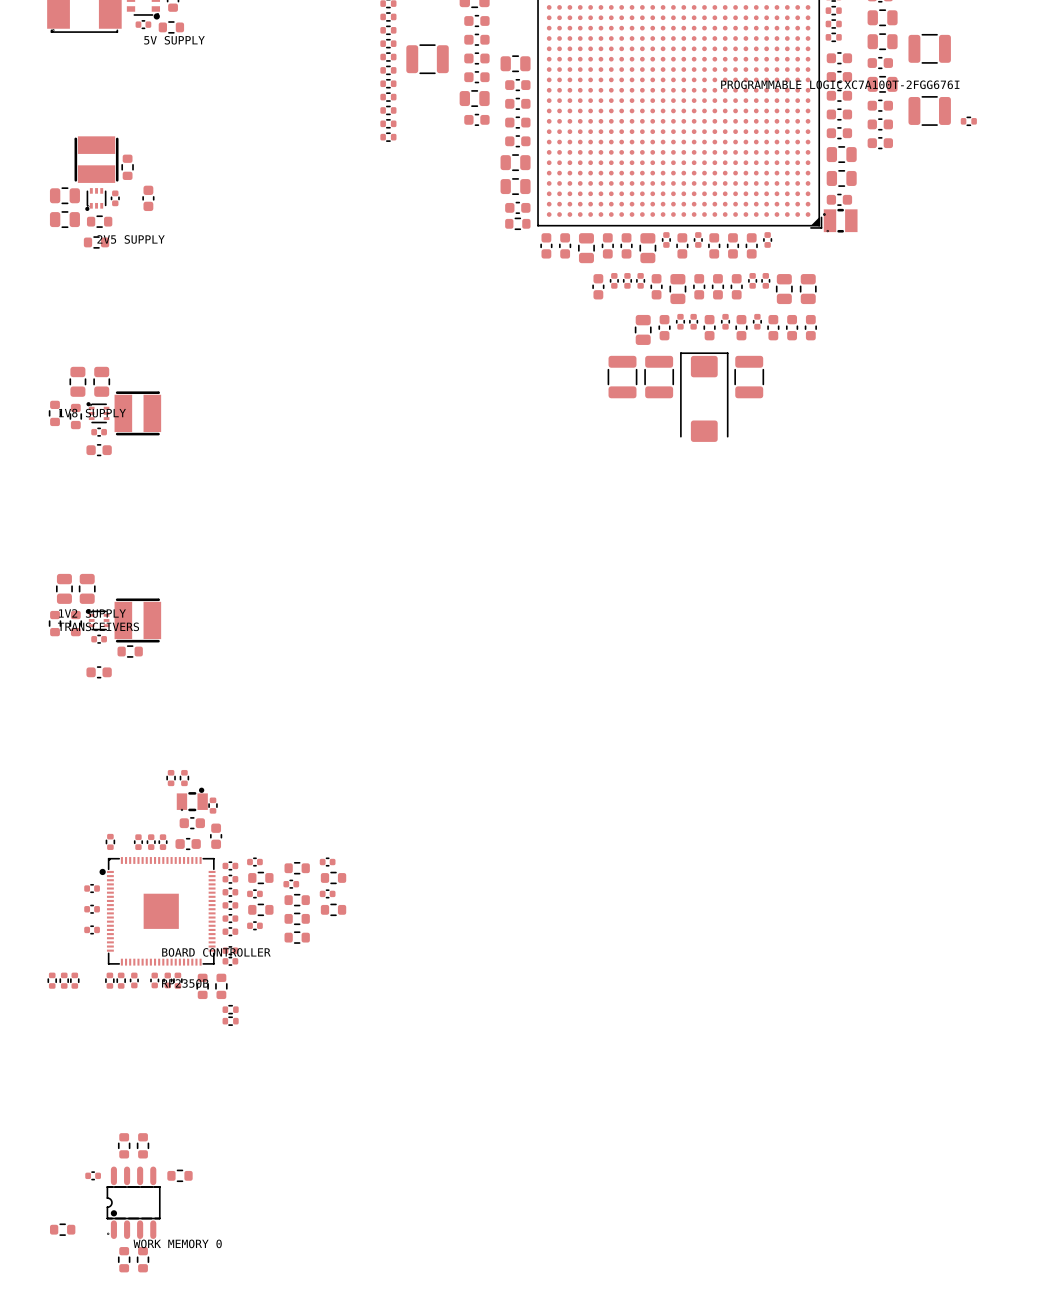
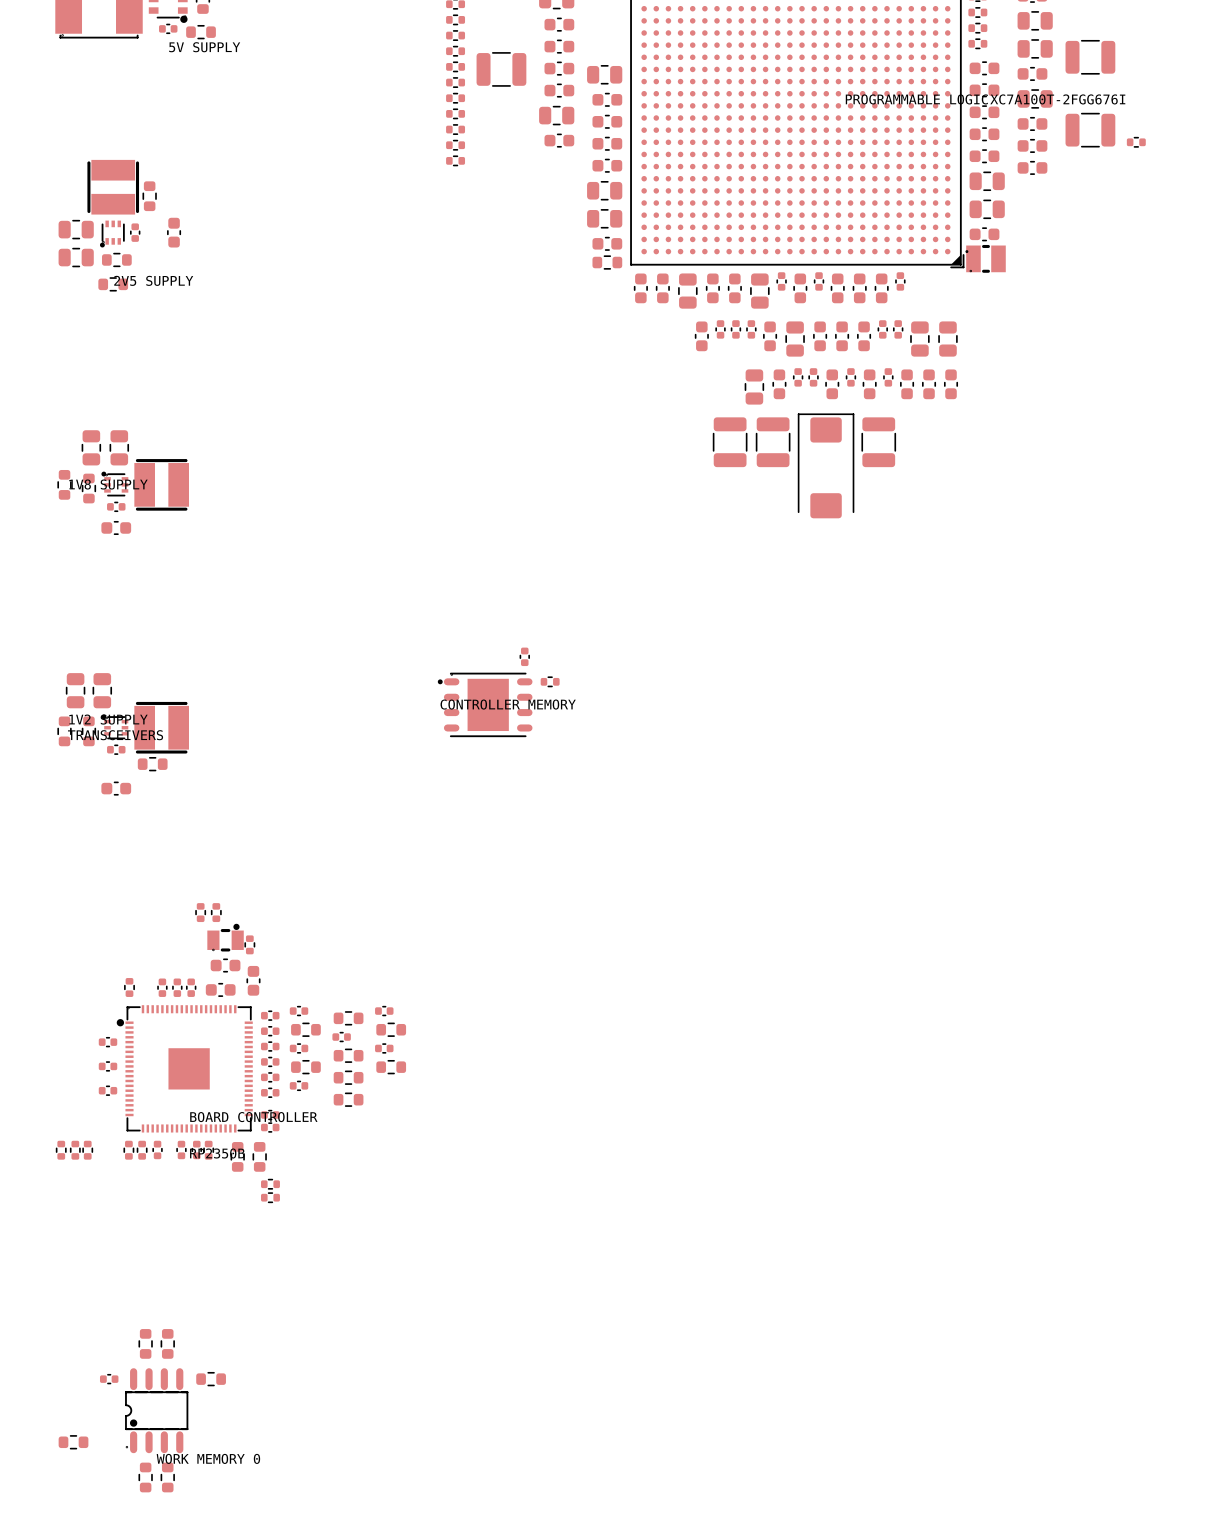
part: none -> (524, 656)
part: none -> (550, 681)
part: none -> (485, 704)

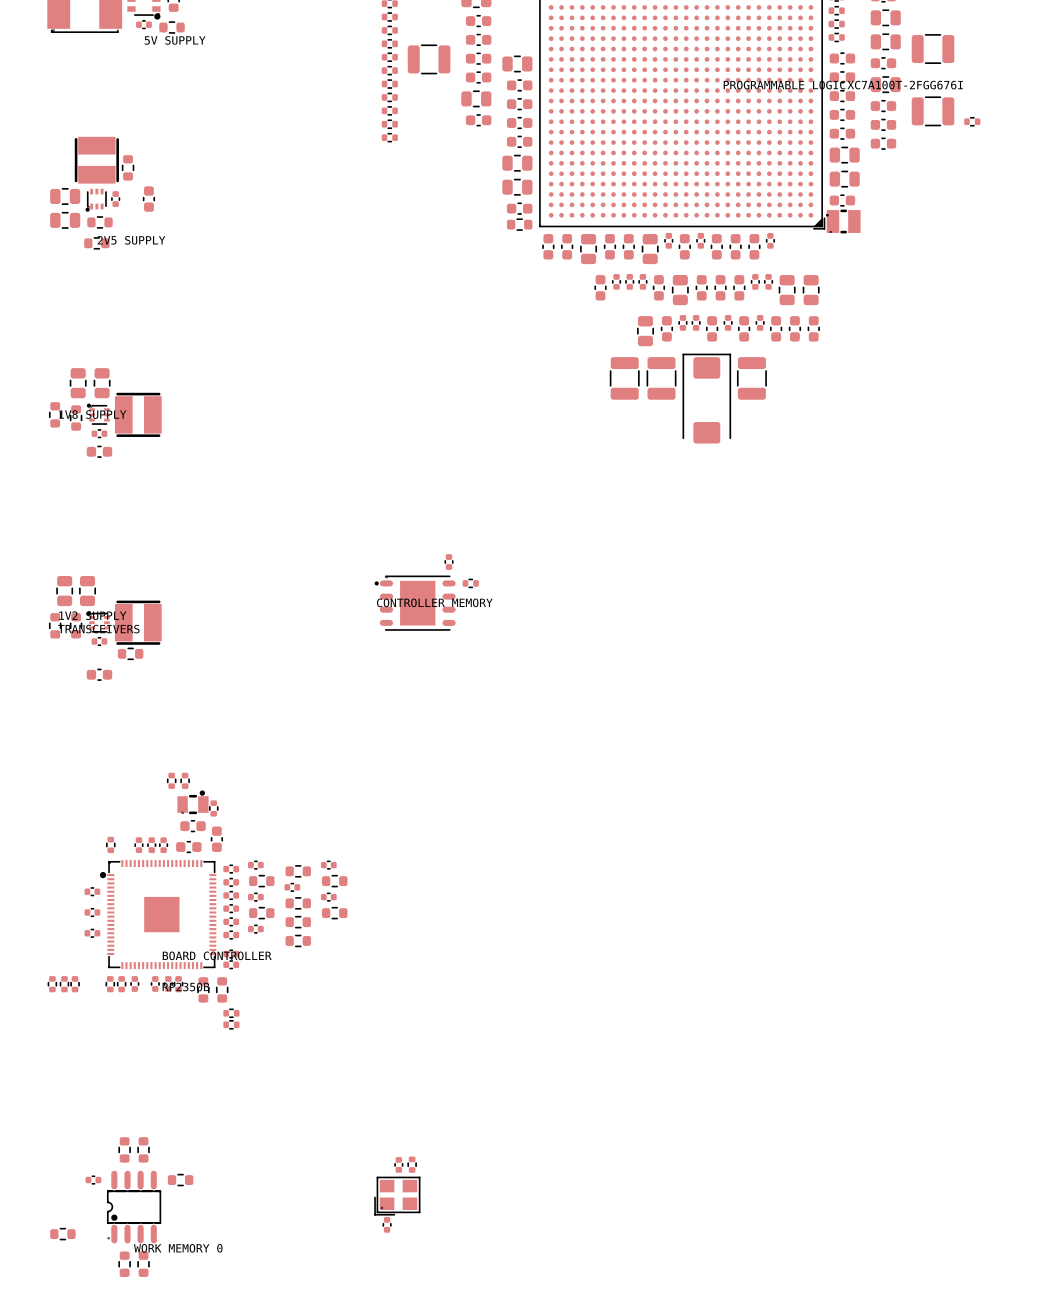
part: none -> (398, 1164)
part: none -> (412, 1164)
part: none -> (397, 1196)
part: none -> (387, 1224)

